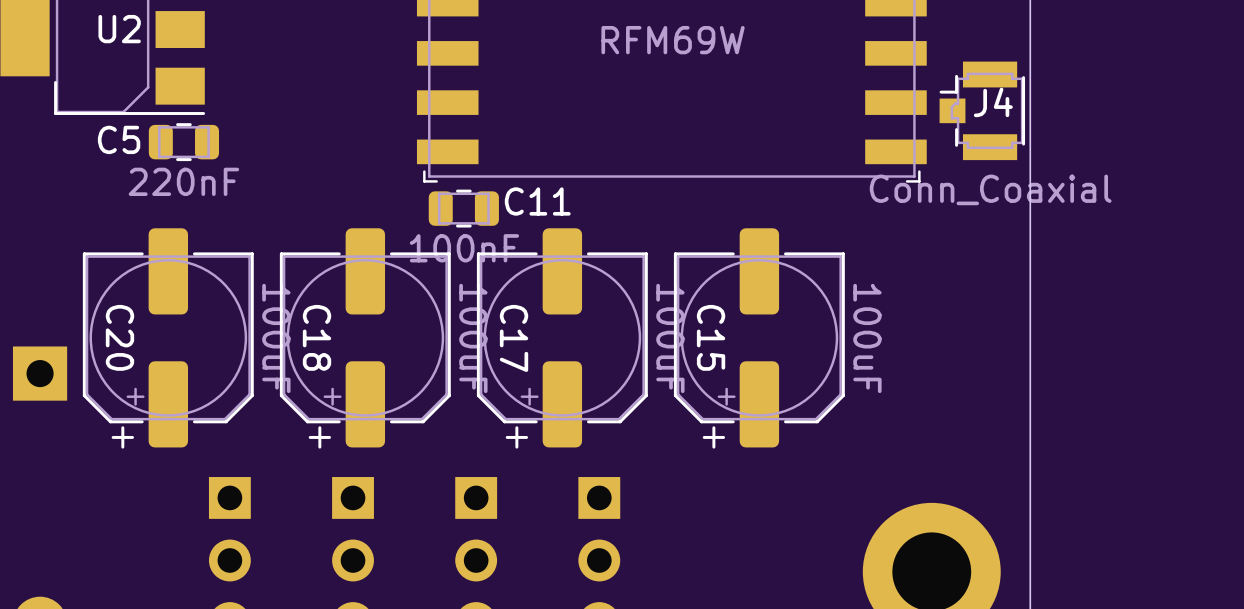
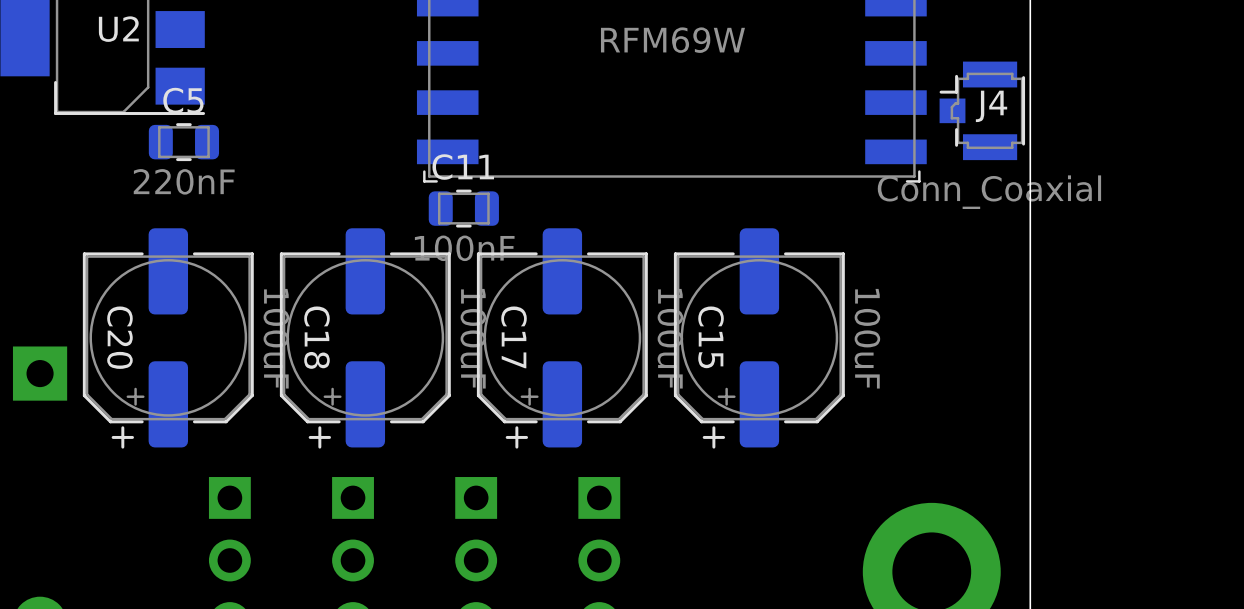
C5 name position: C5 (119, 139) -> C5 (183, 100)
C11 name position: C11 (537, 201) -> C11 (463, 167)

